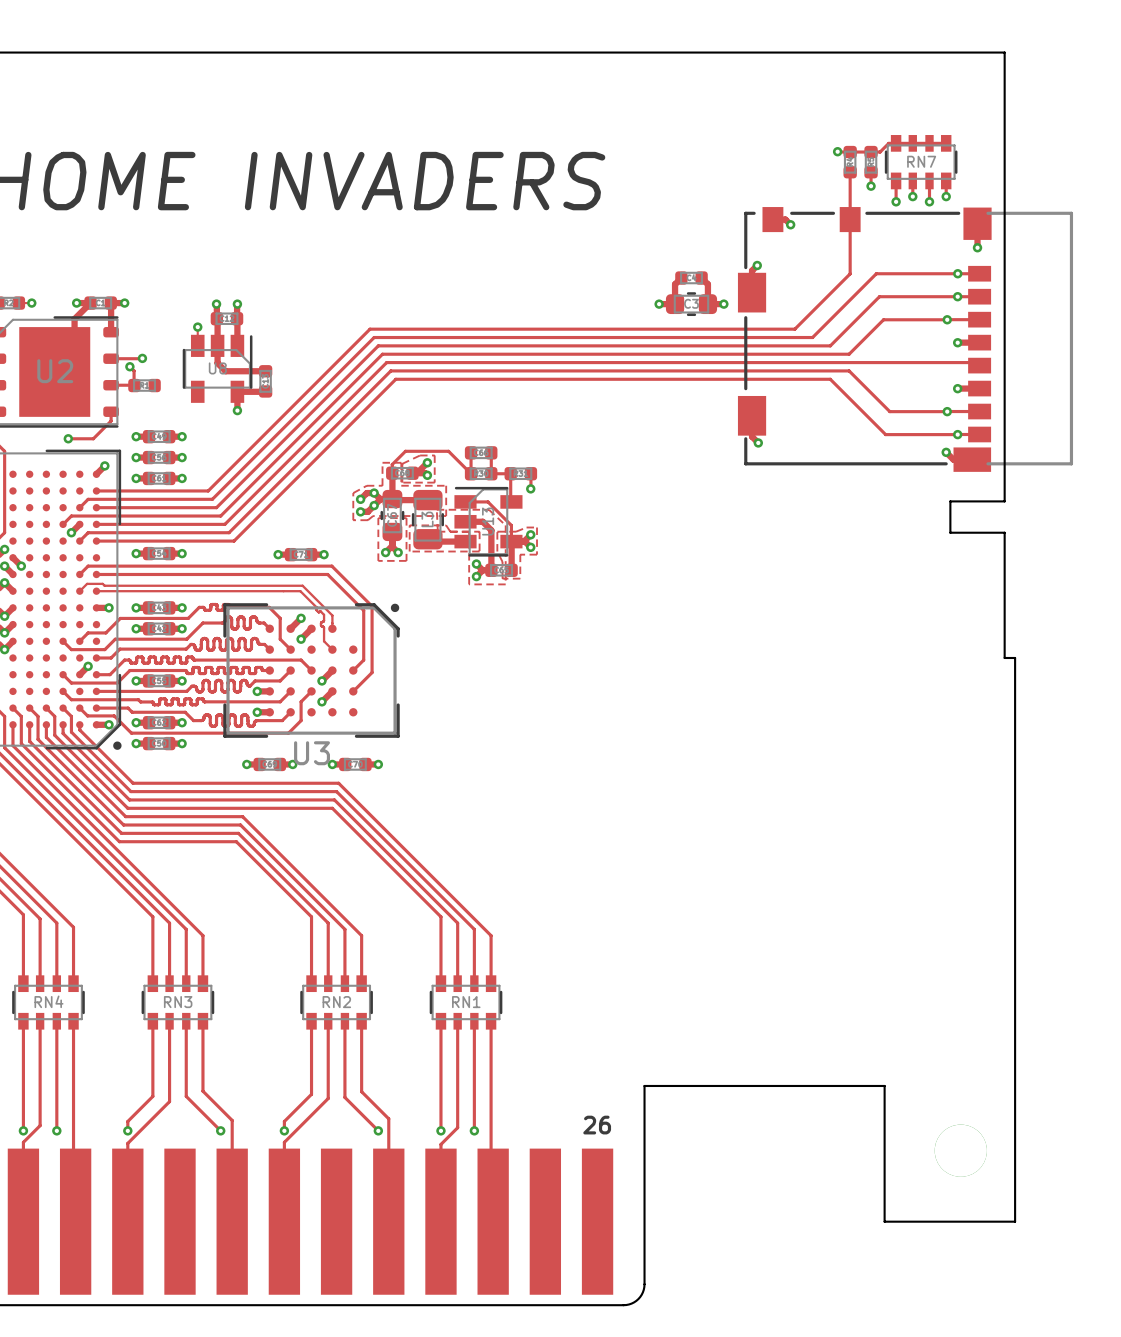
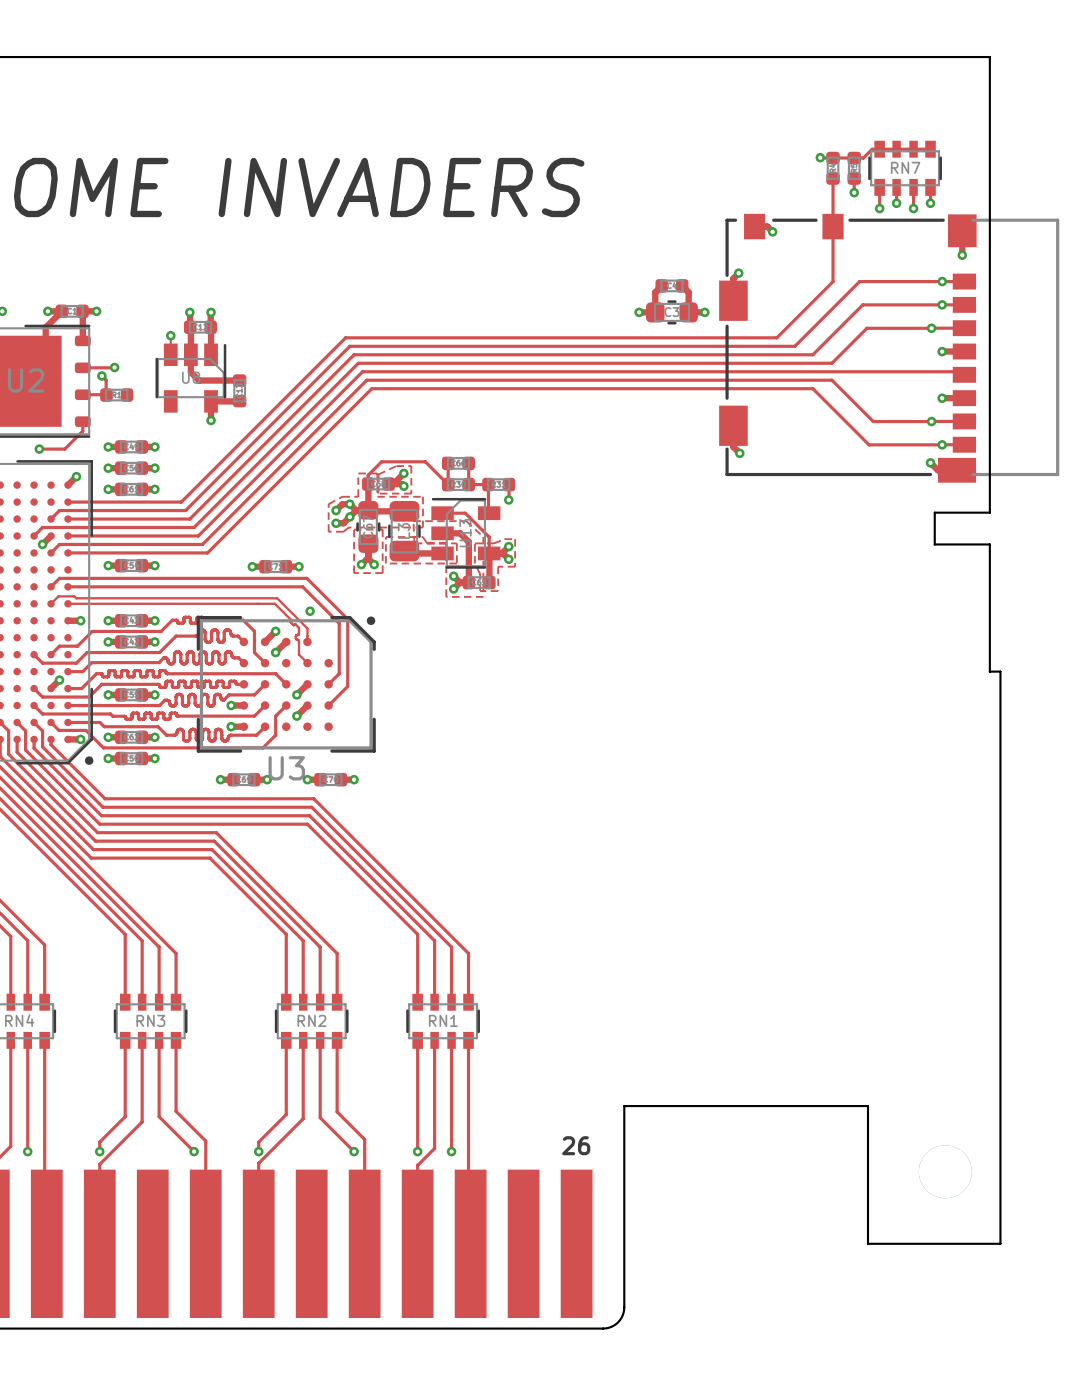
via: none -> (310, 611)

